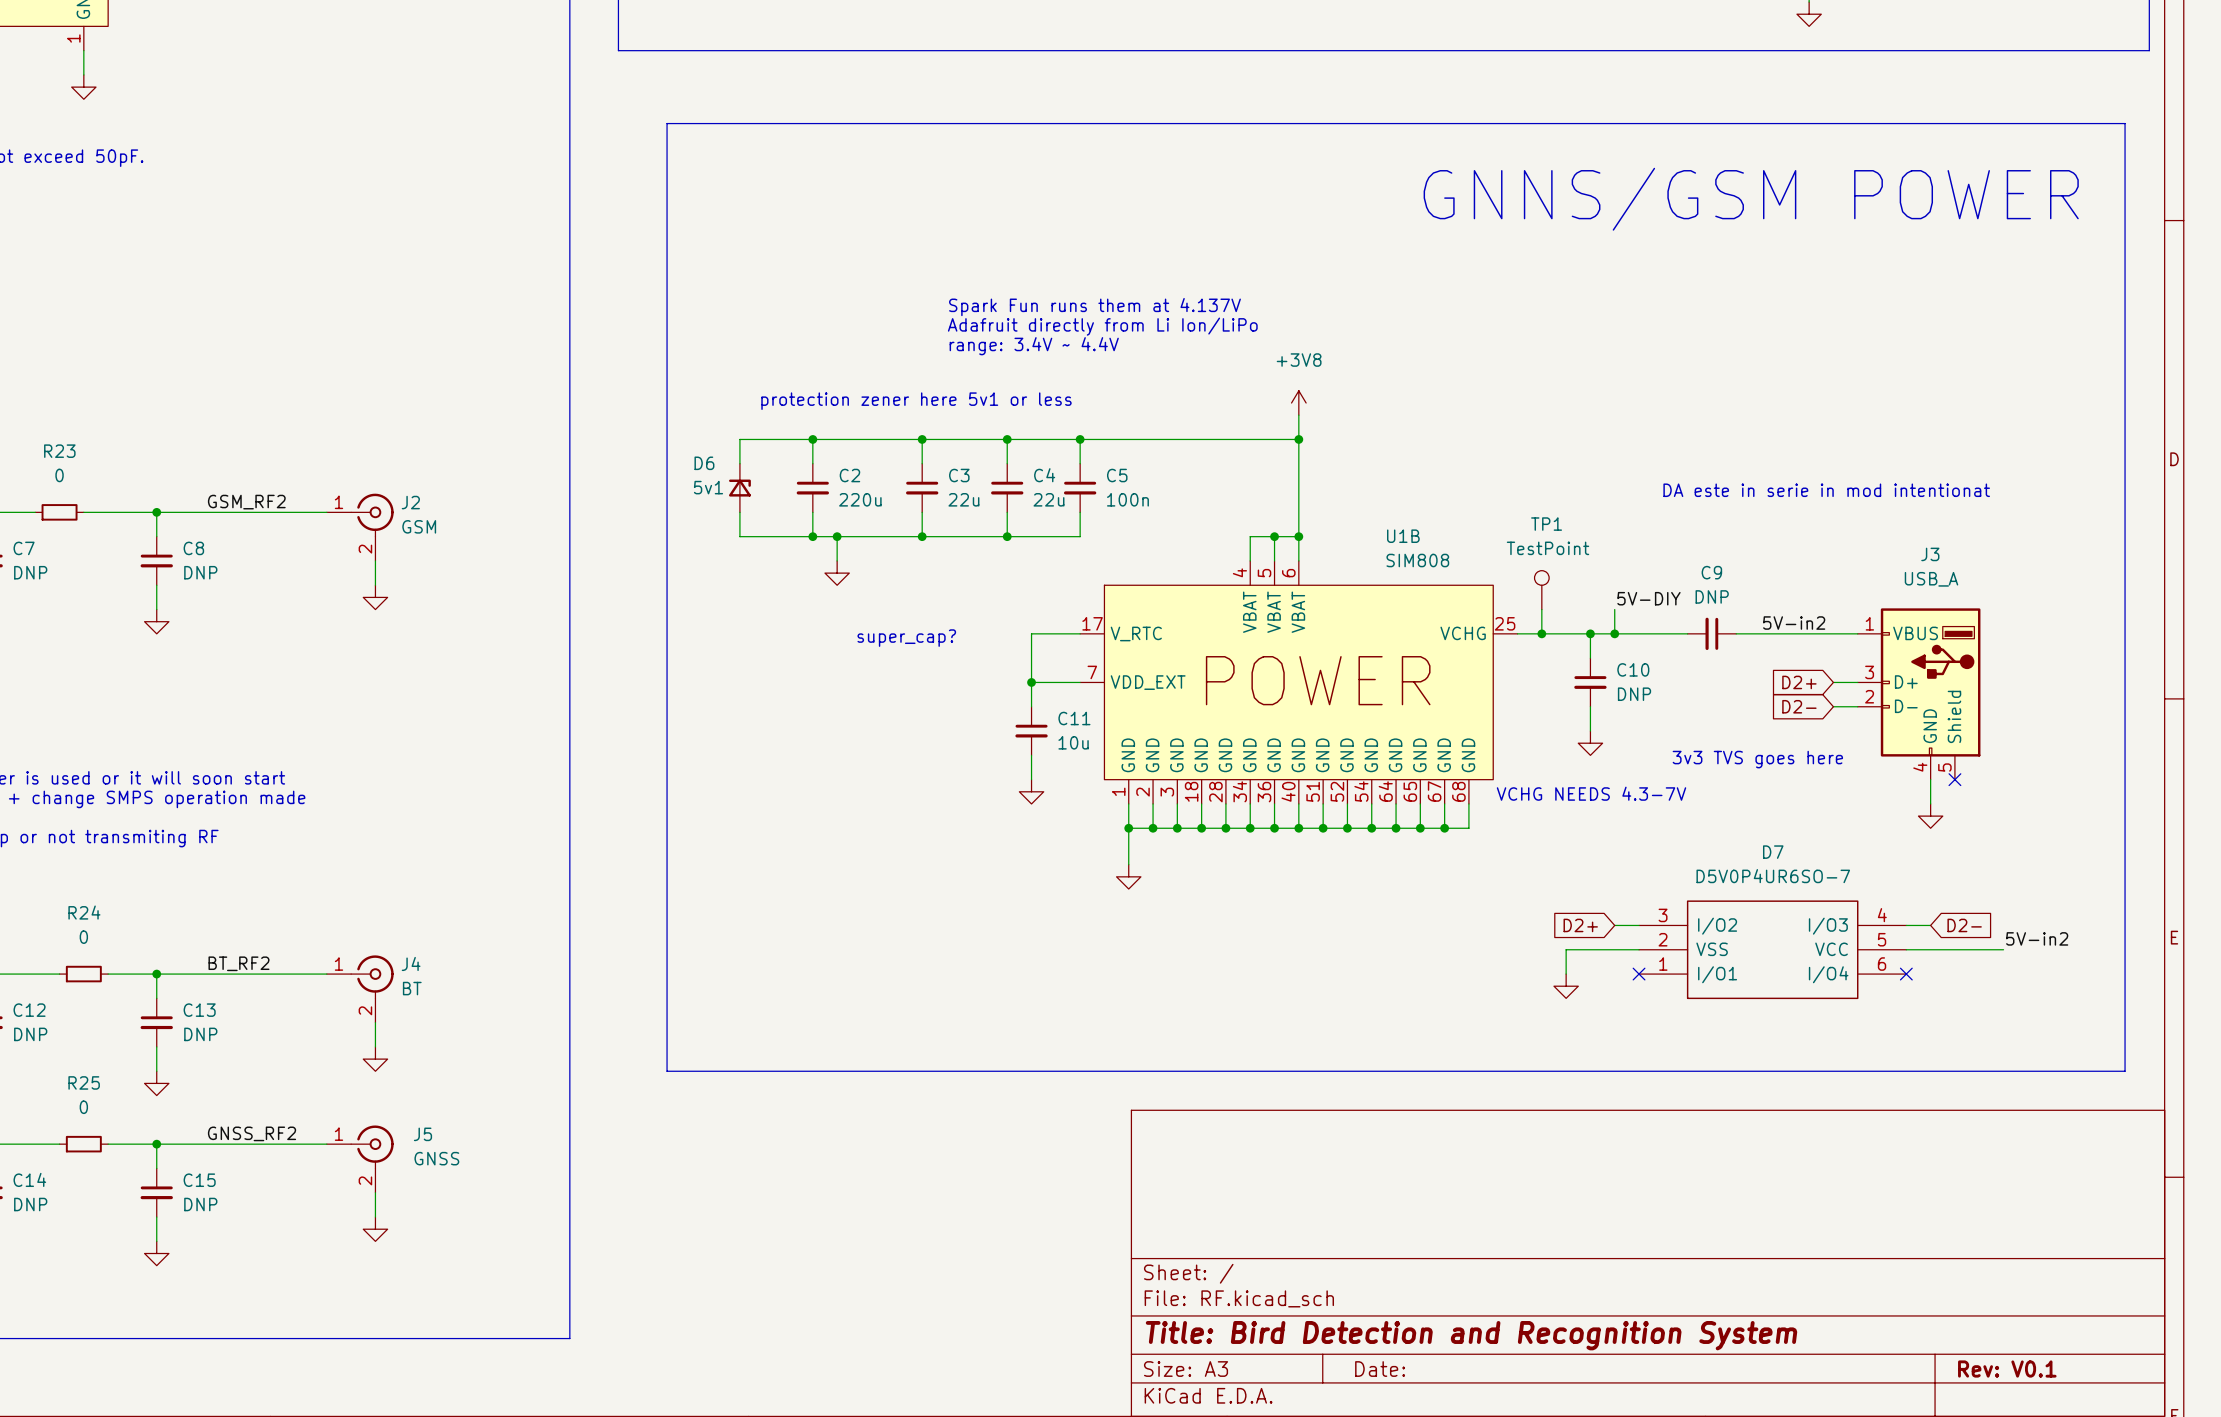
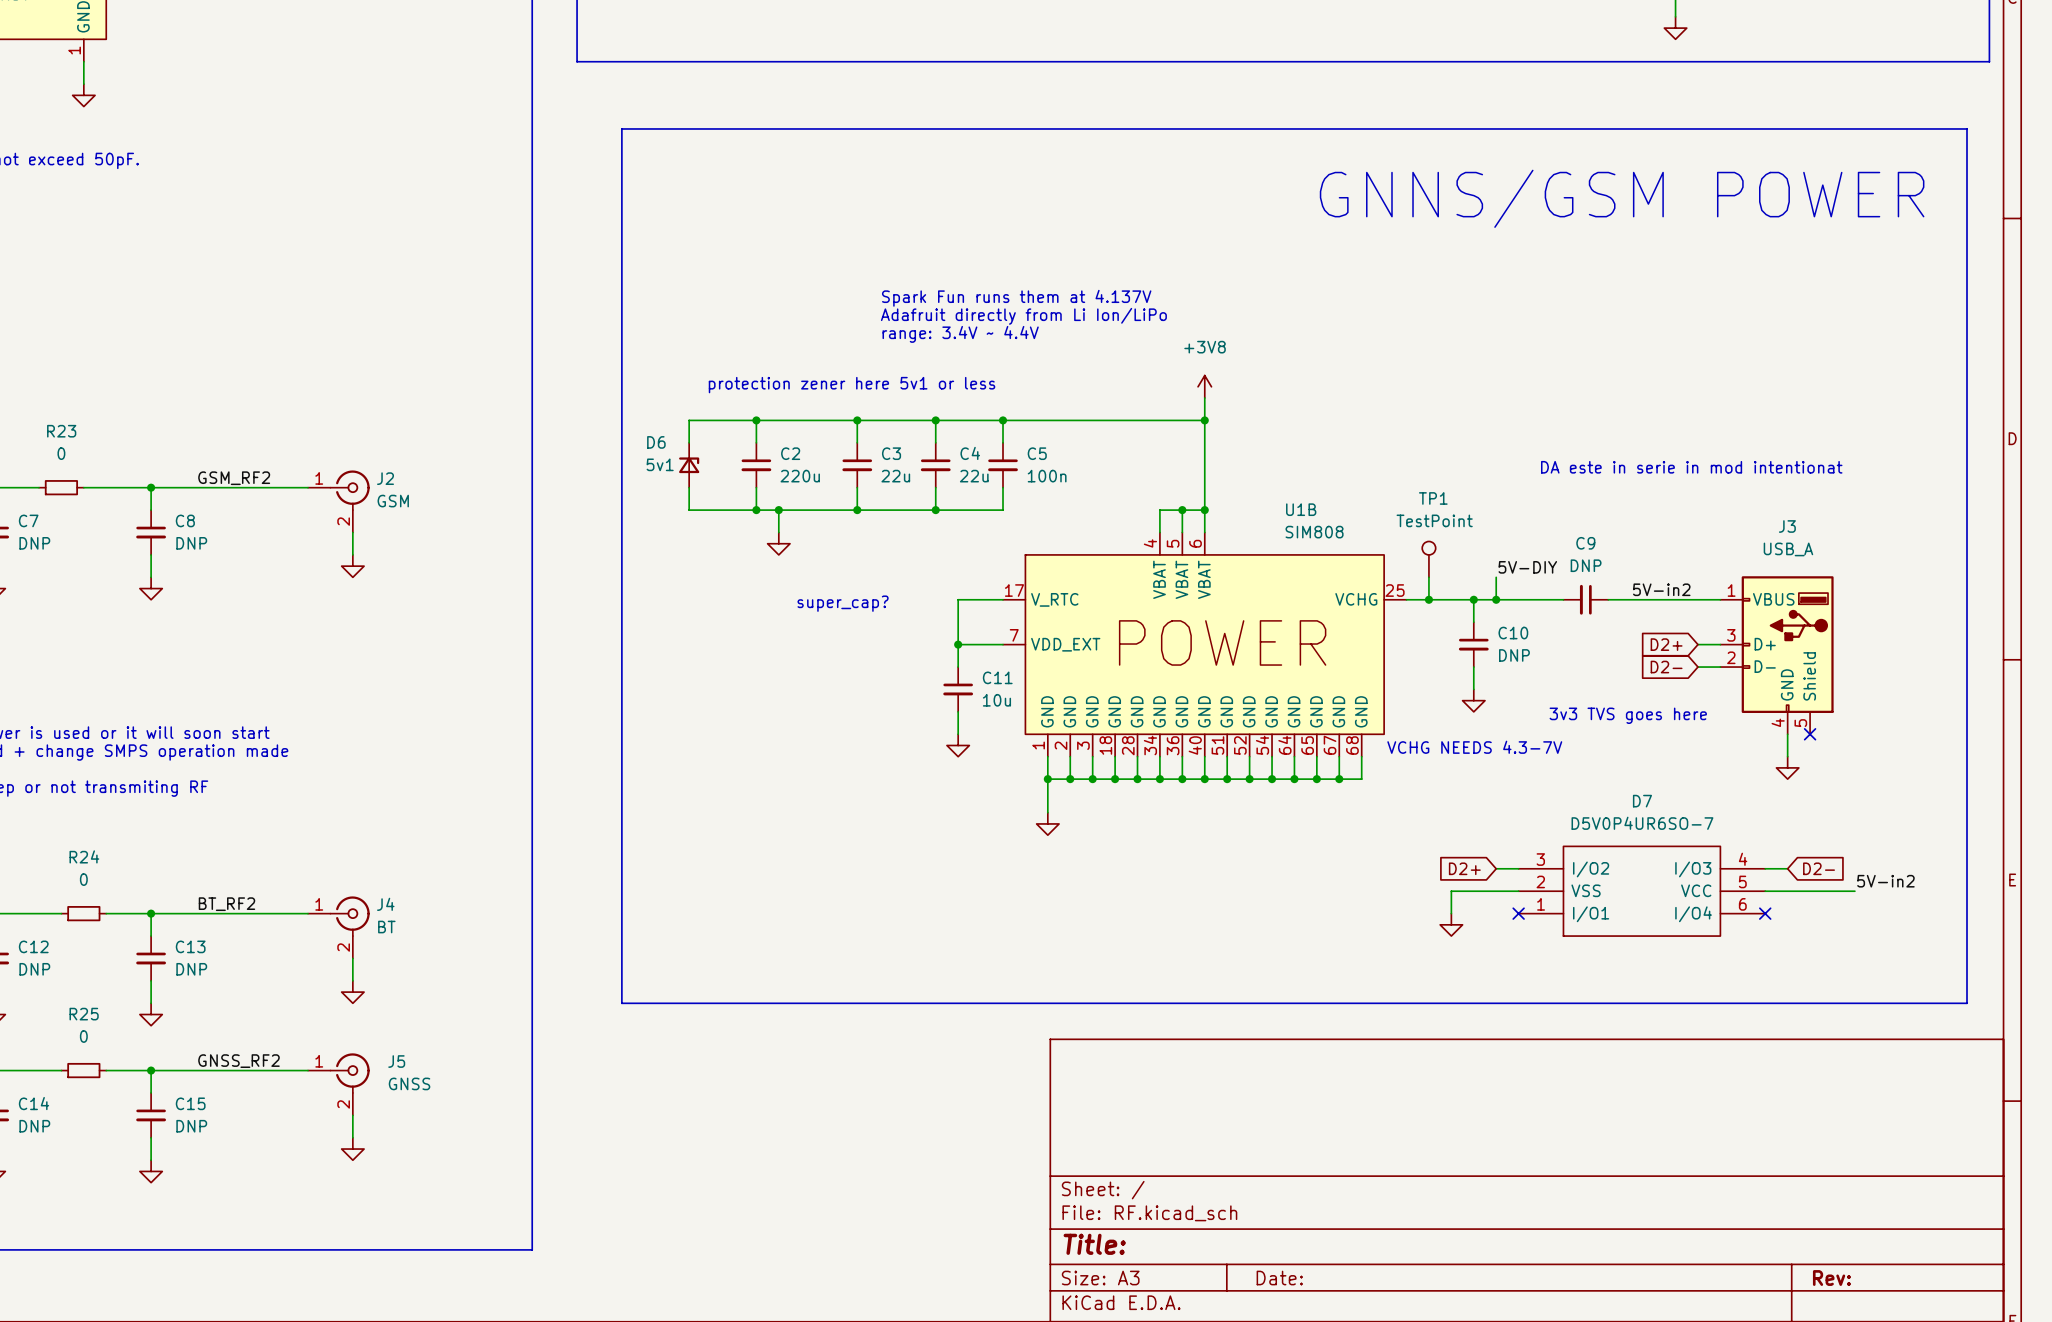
title block: Title: Bird Detection and Recognition System (1471, 1335) -> Title: (1094, 1244)
title block: Rev: V0.1 (2007, 1369) -> Rev: (1831, 1278)

